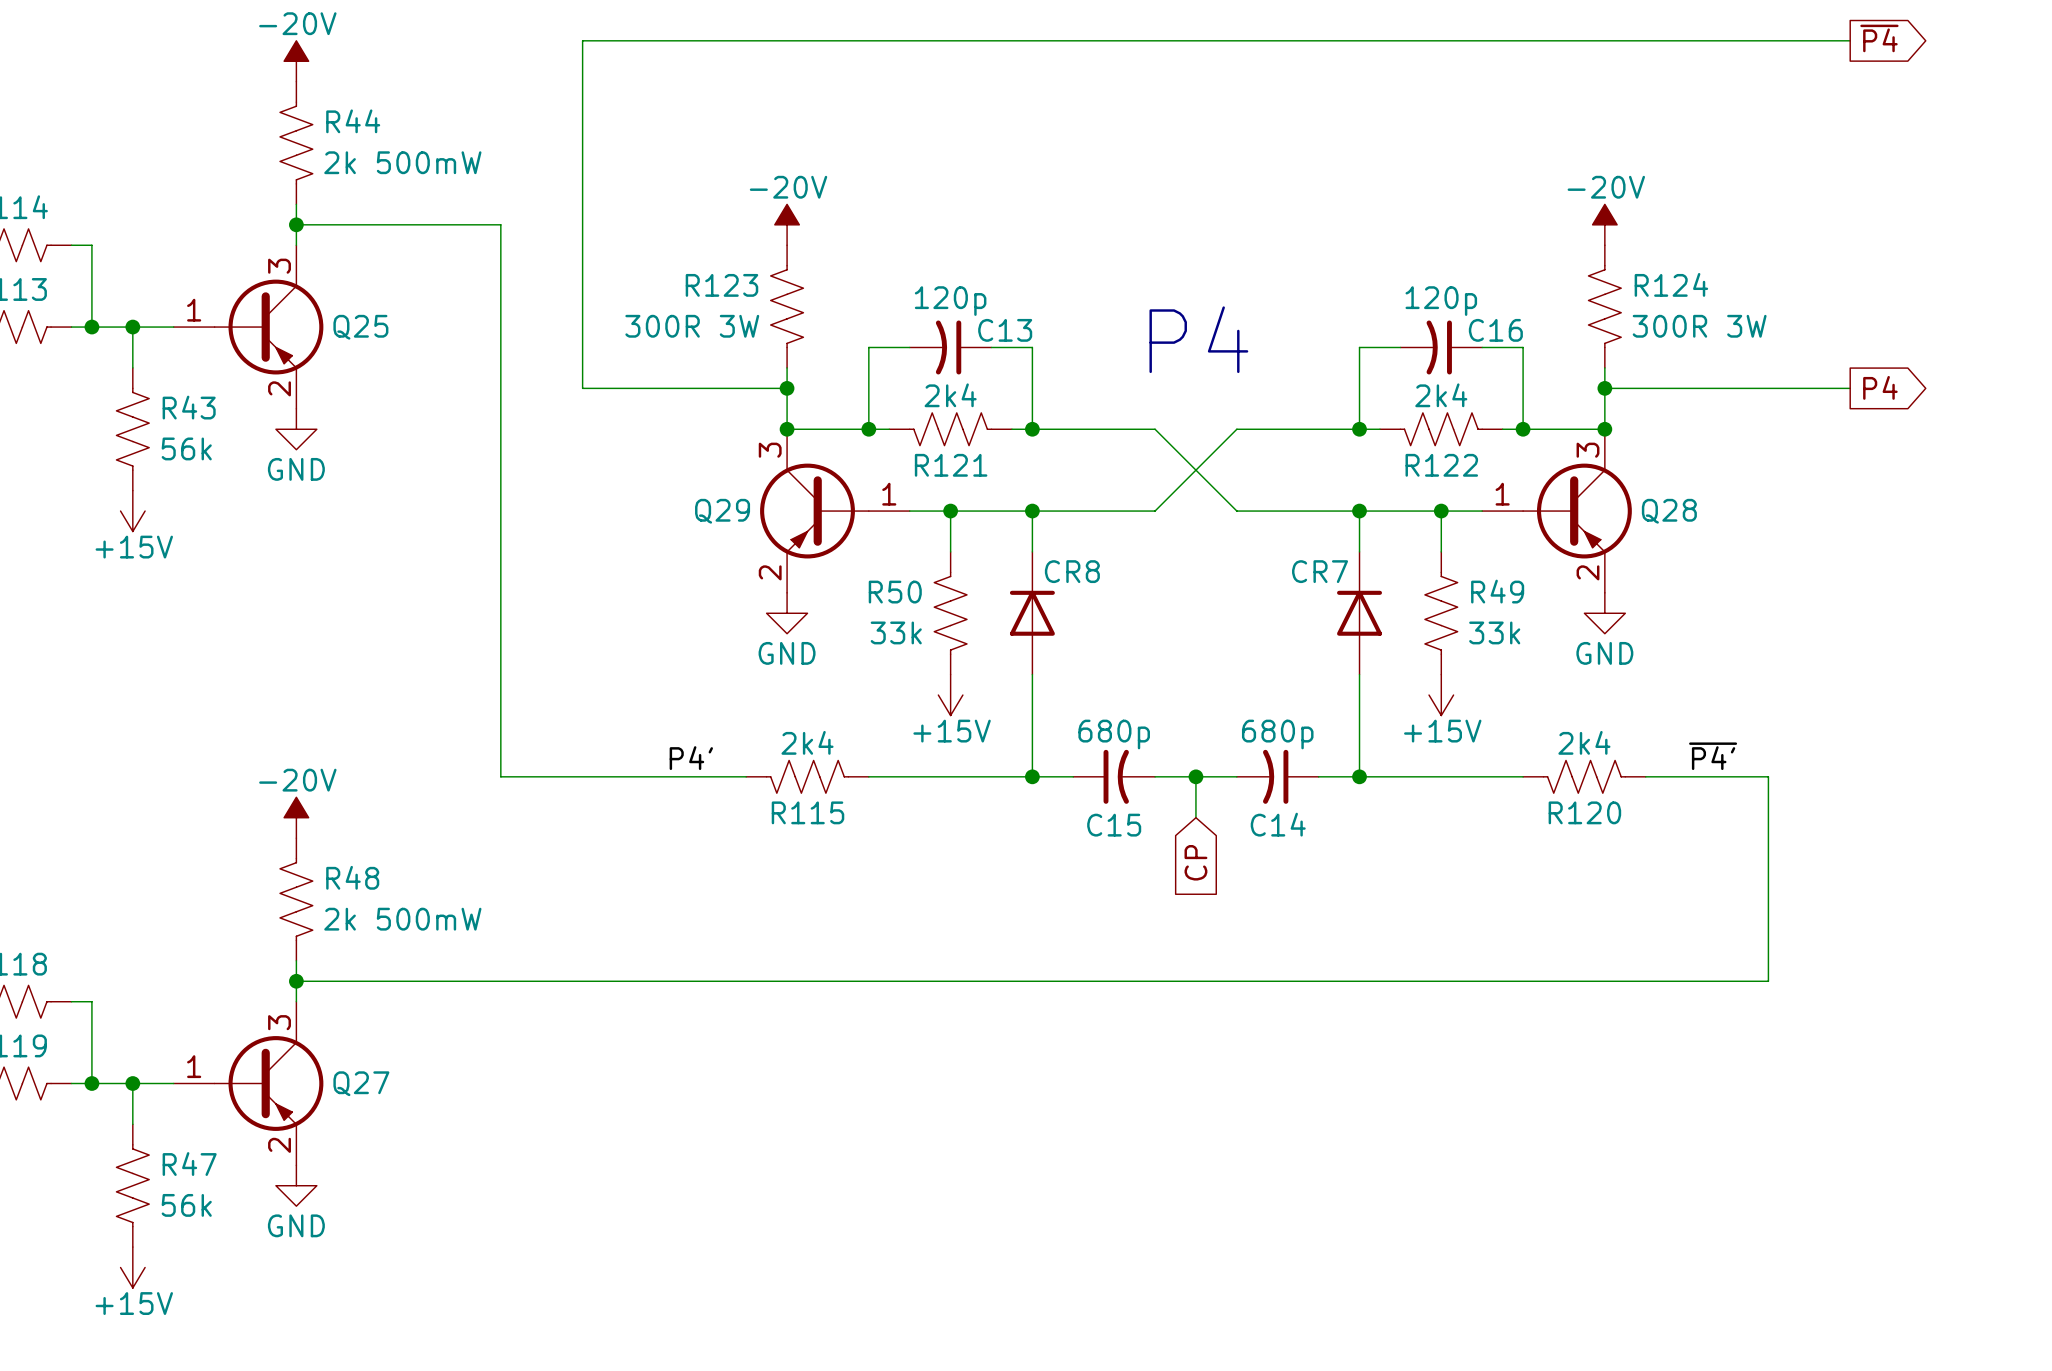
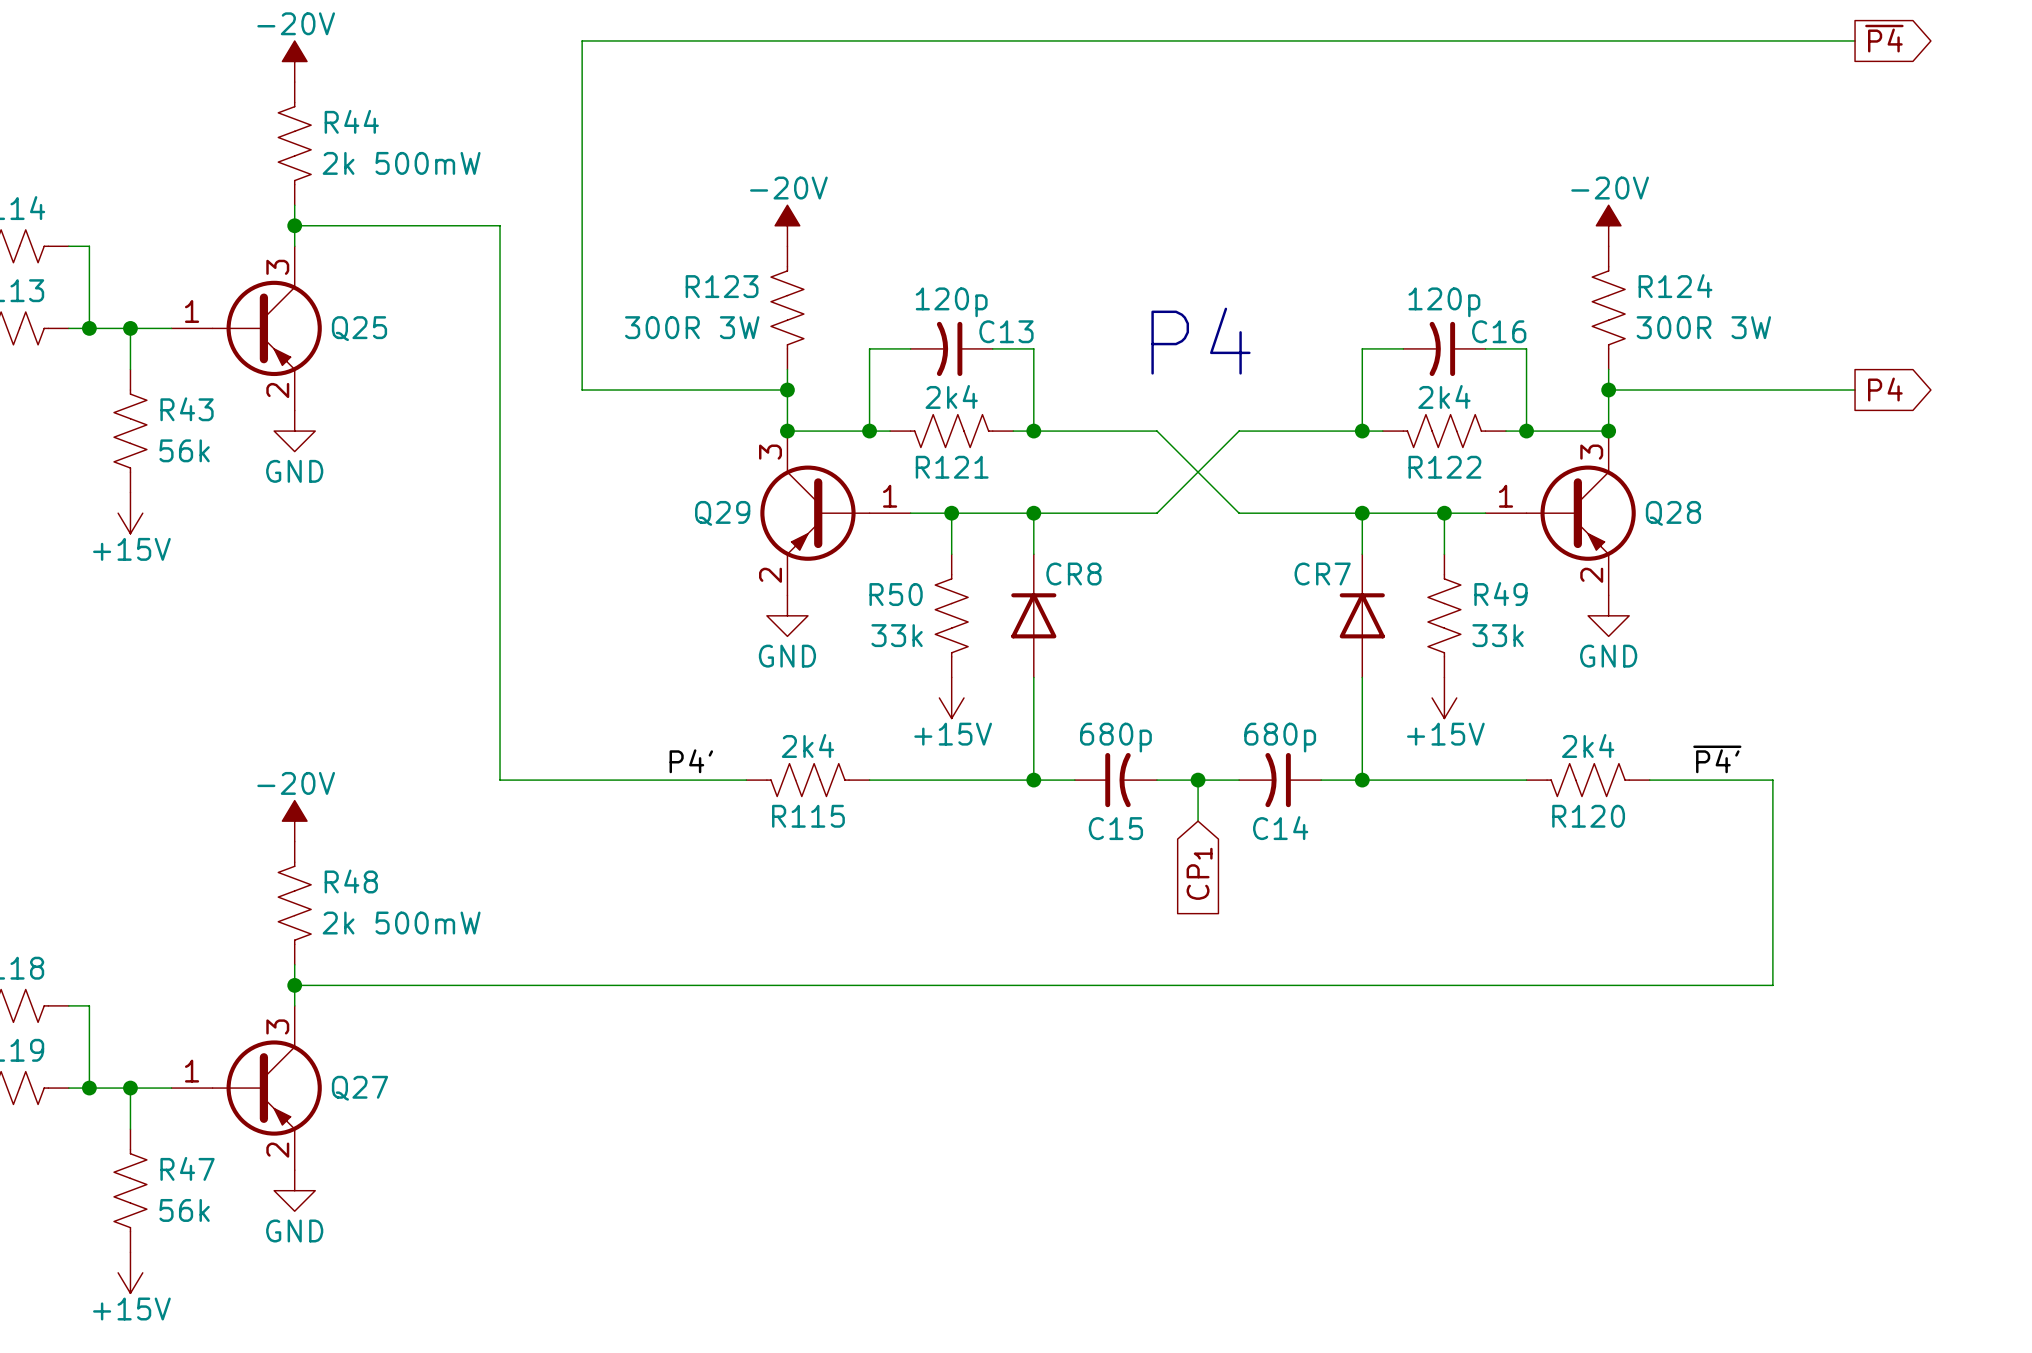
global label: CP (1195, 862) -> CP1 (1199, 873)

